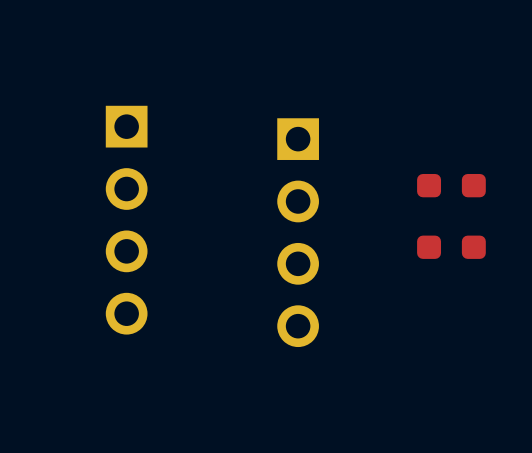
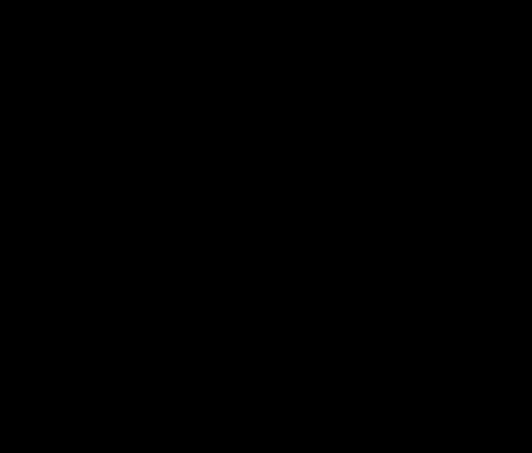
part: (451, 185) -> none
part: (126, 220) -> none
part: (298, 232) -> none
part: (451, 247) -> none

